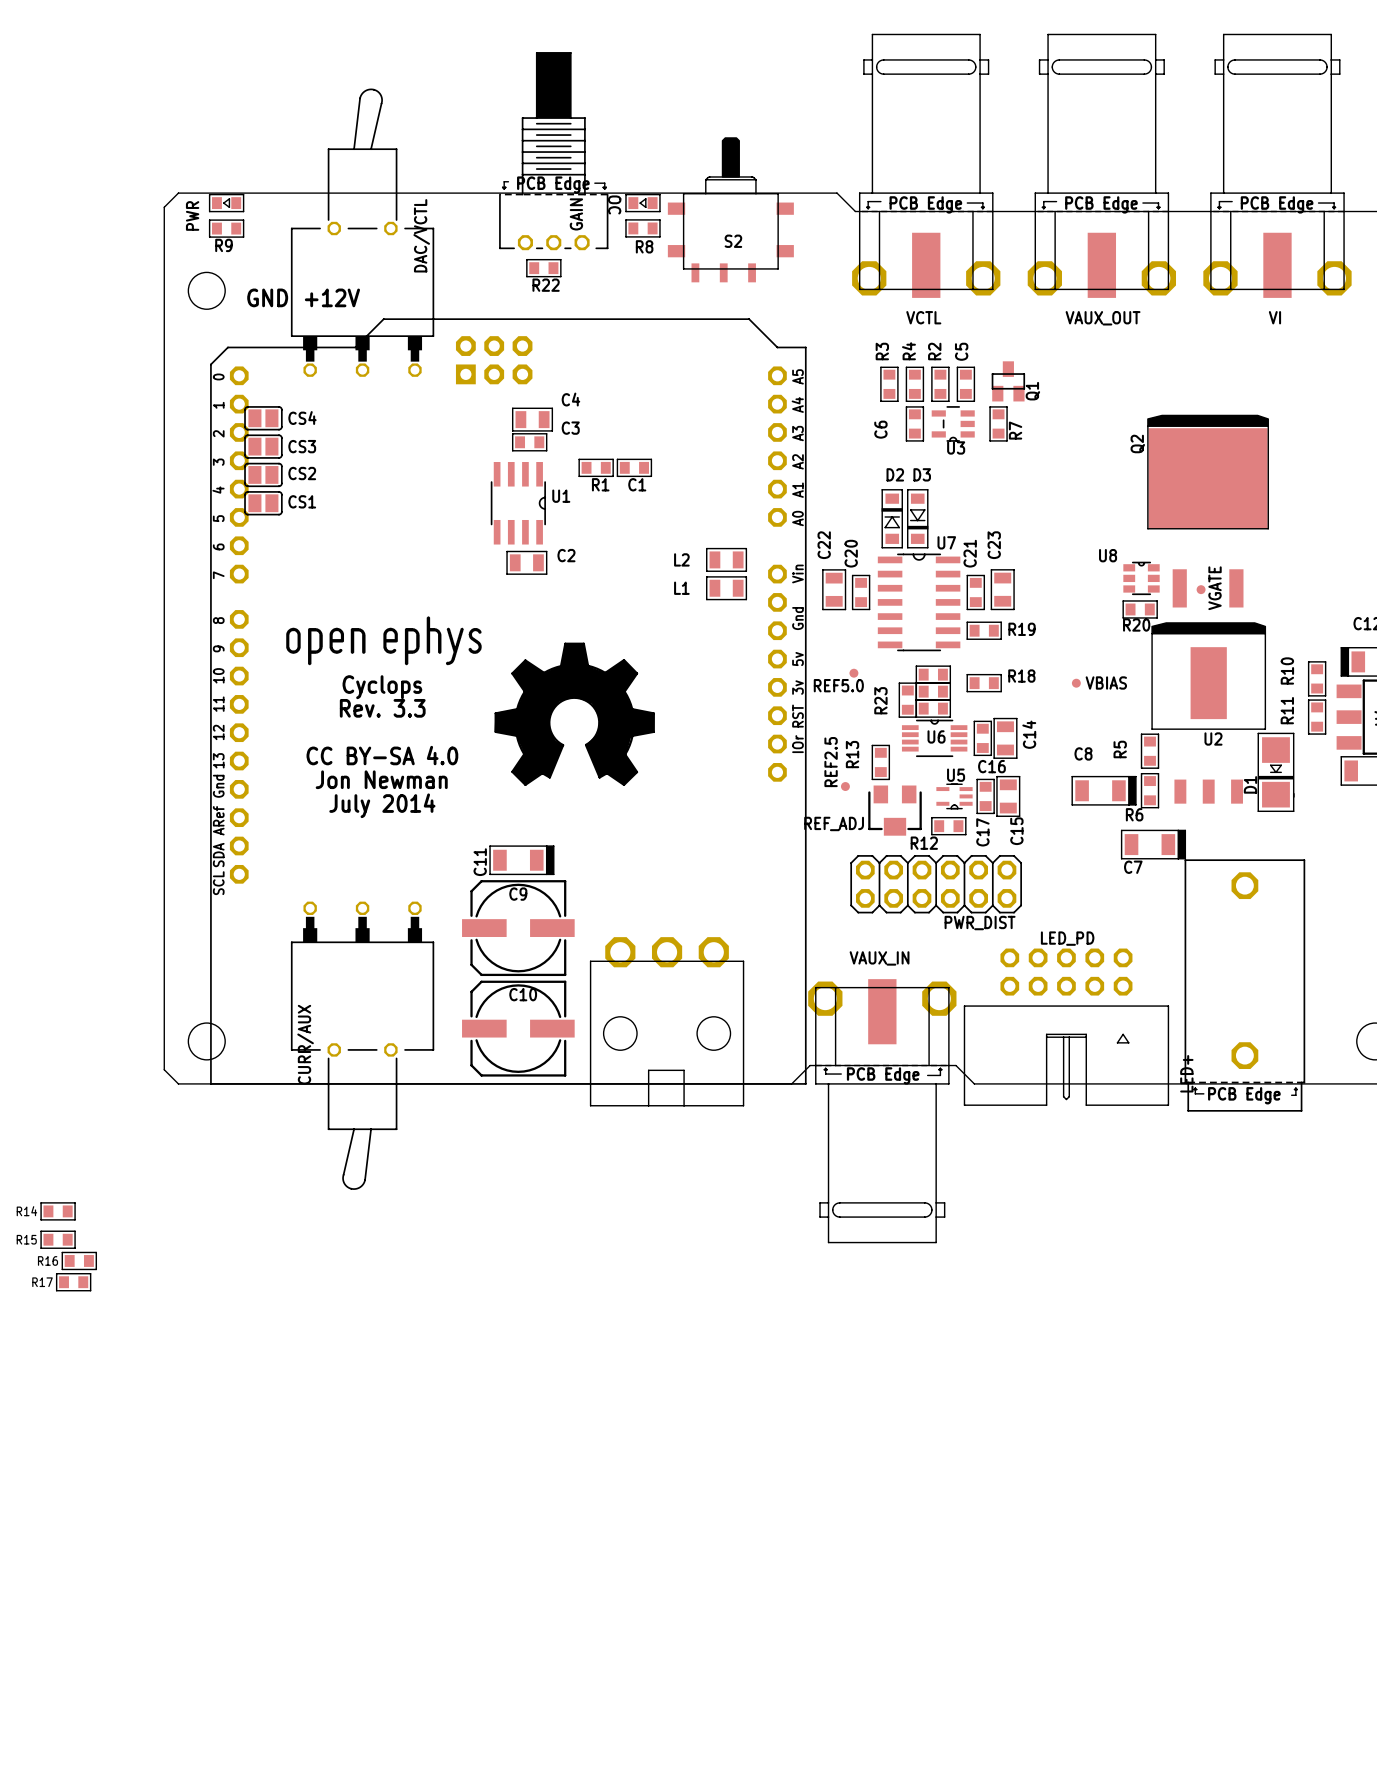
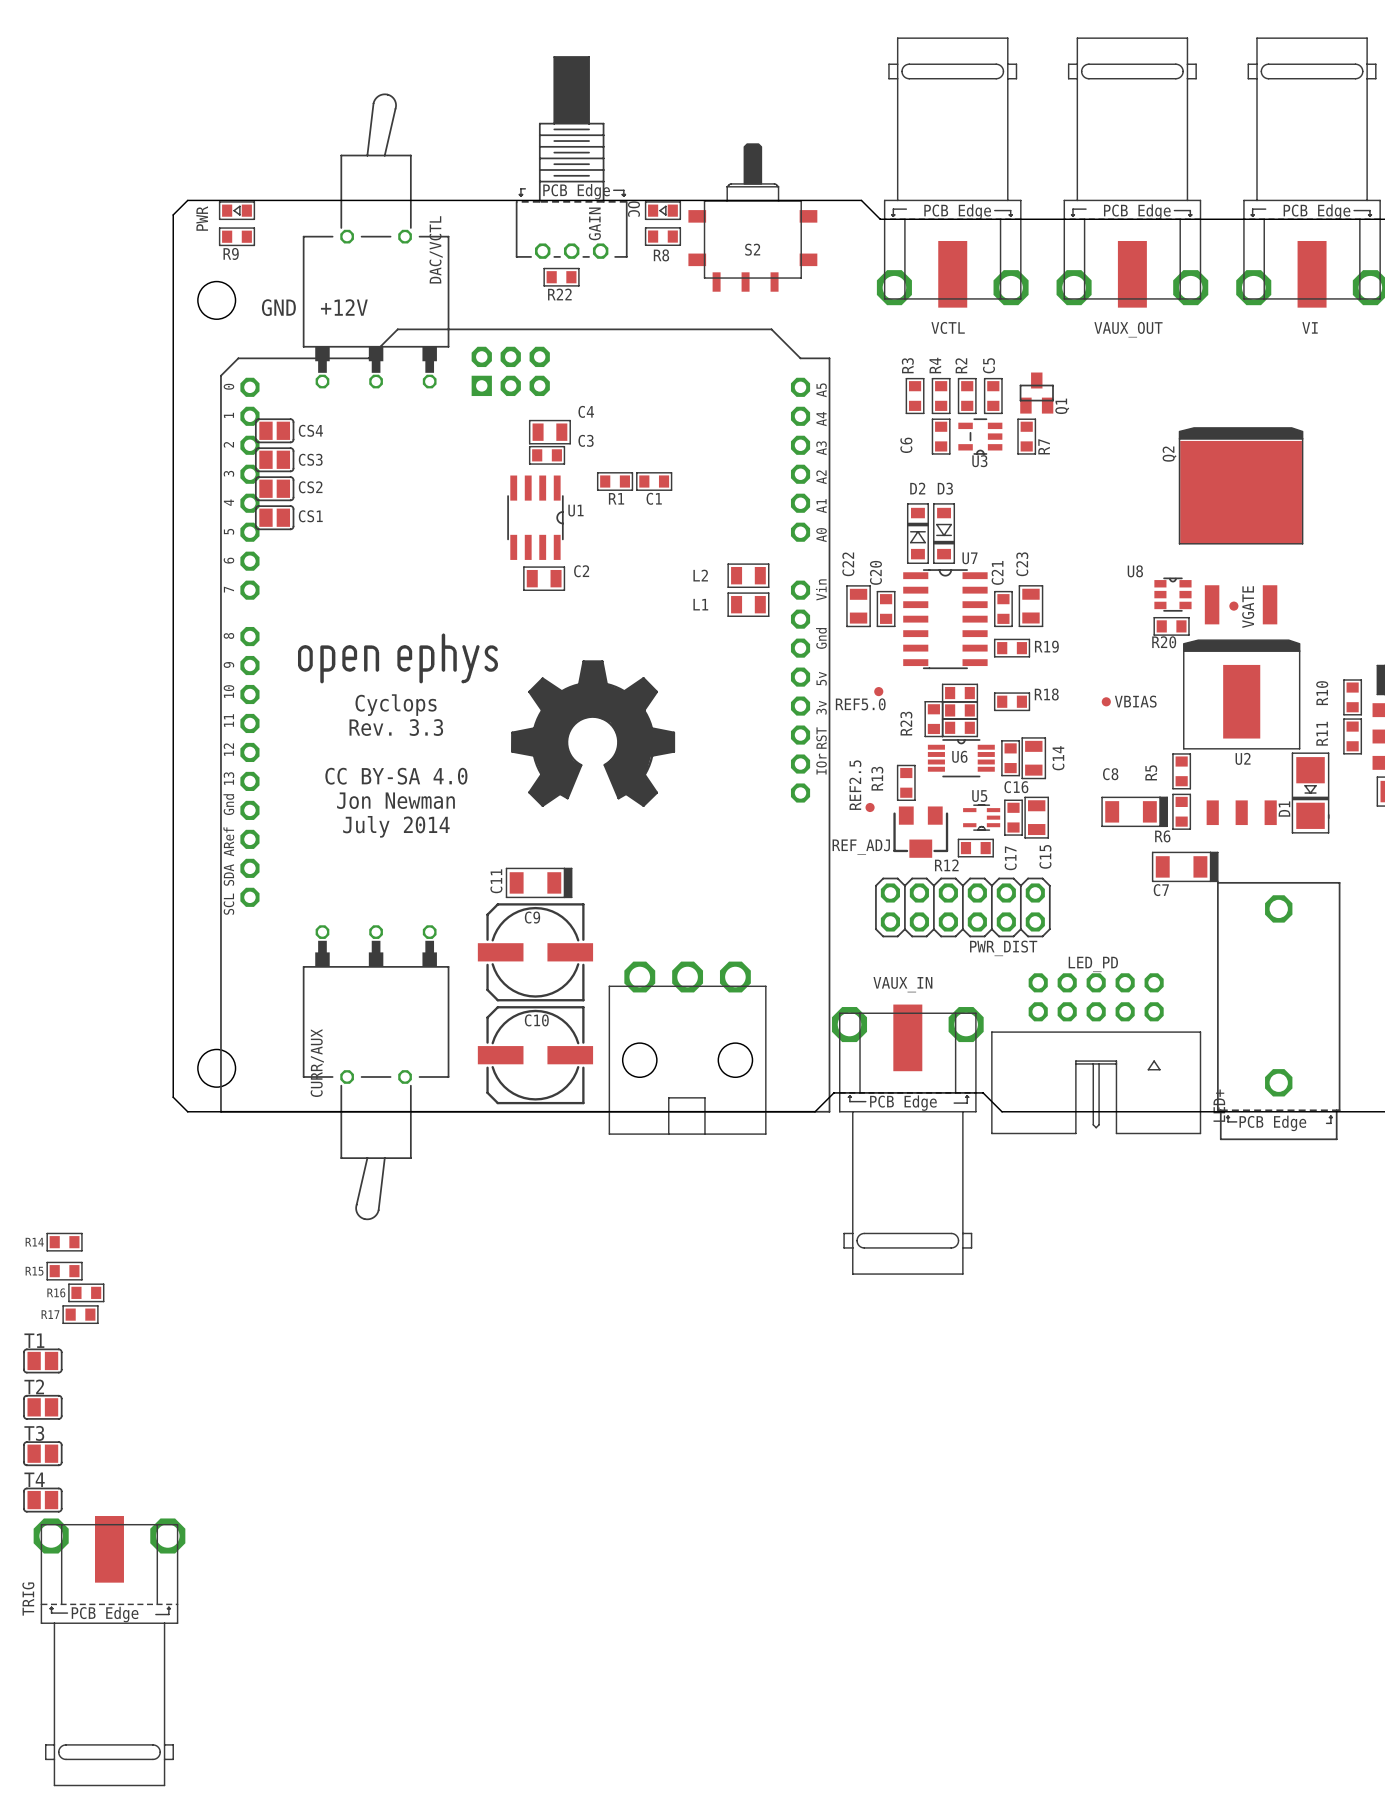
T1: none -> (42, 1360)
T2: none -> (42, 1407)
T3: none -> (42, 1453)
T4: none -> (42, 1500)
TRIG: none -> (109, 1651)

